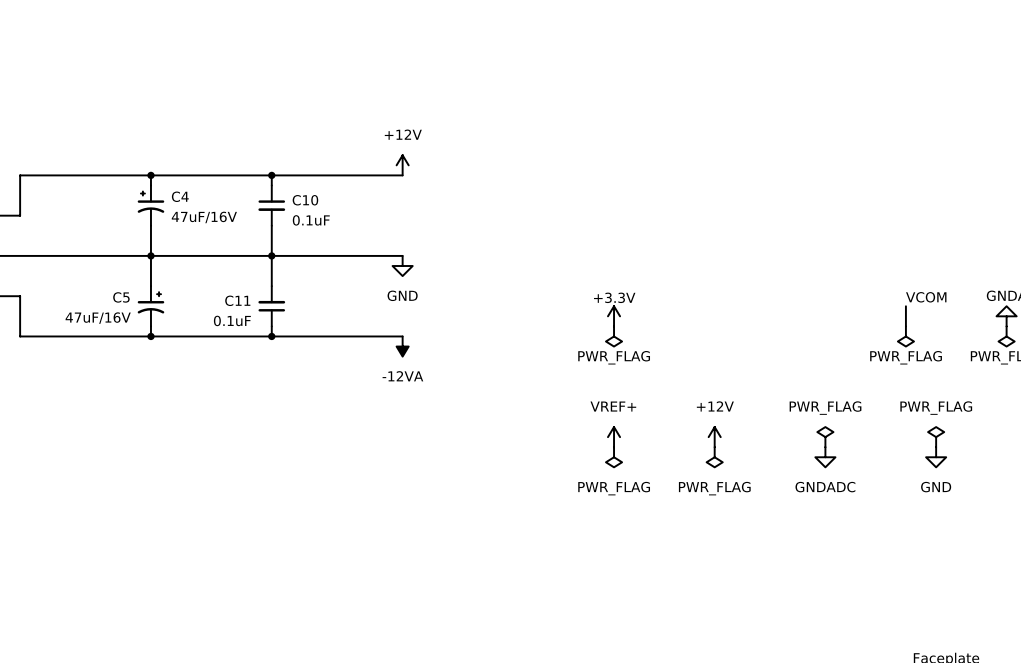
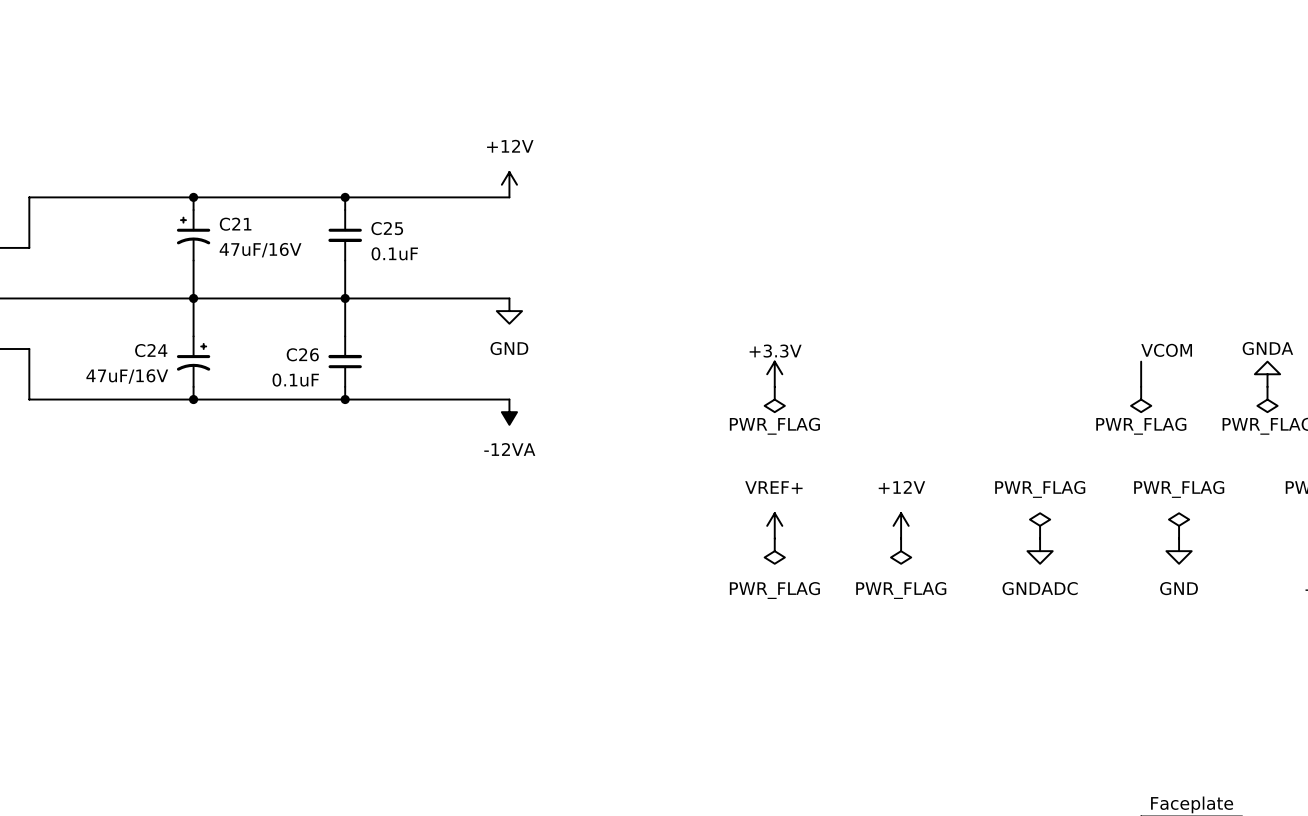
C4 name: C4 (180, 196) -> C21 (235, 224)
C10 name: C10 (305, 200) -> C25 (387, 228)
C5 name: C5 (121, 297) -> C24 (151, 350)
C11 name: C11 (237, 300) -> C26 (302, 354)

